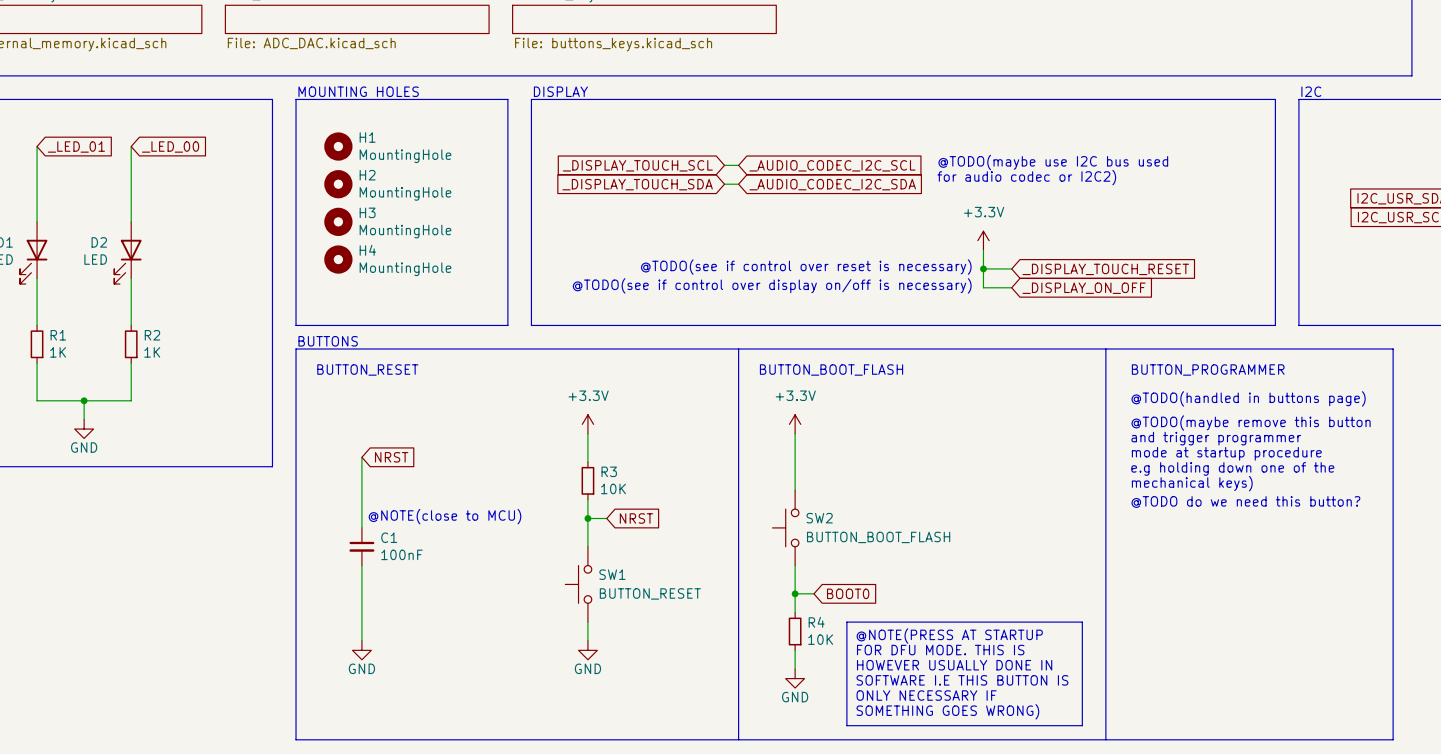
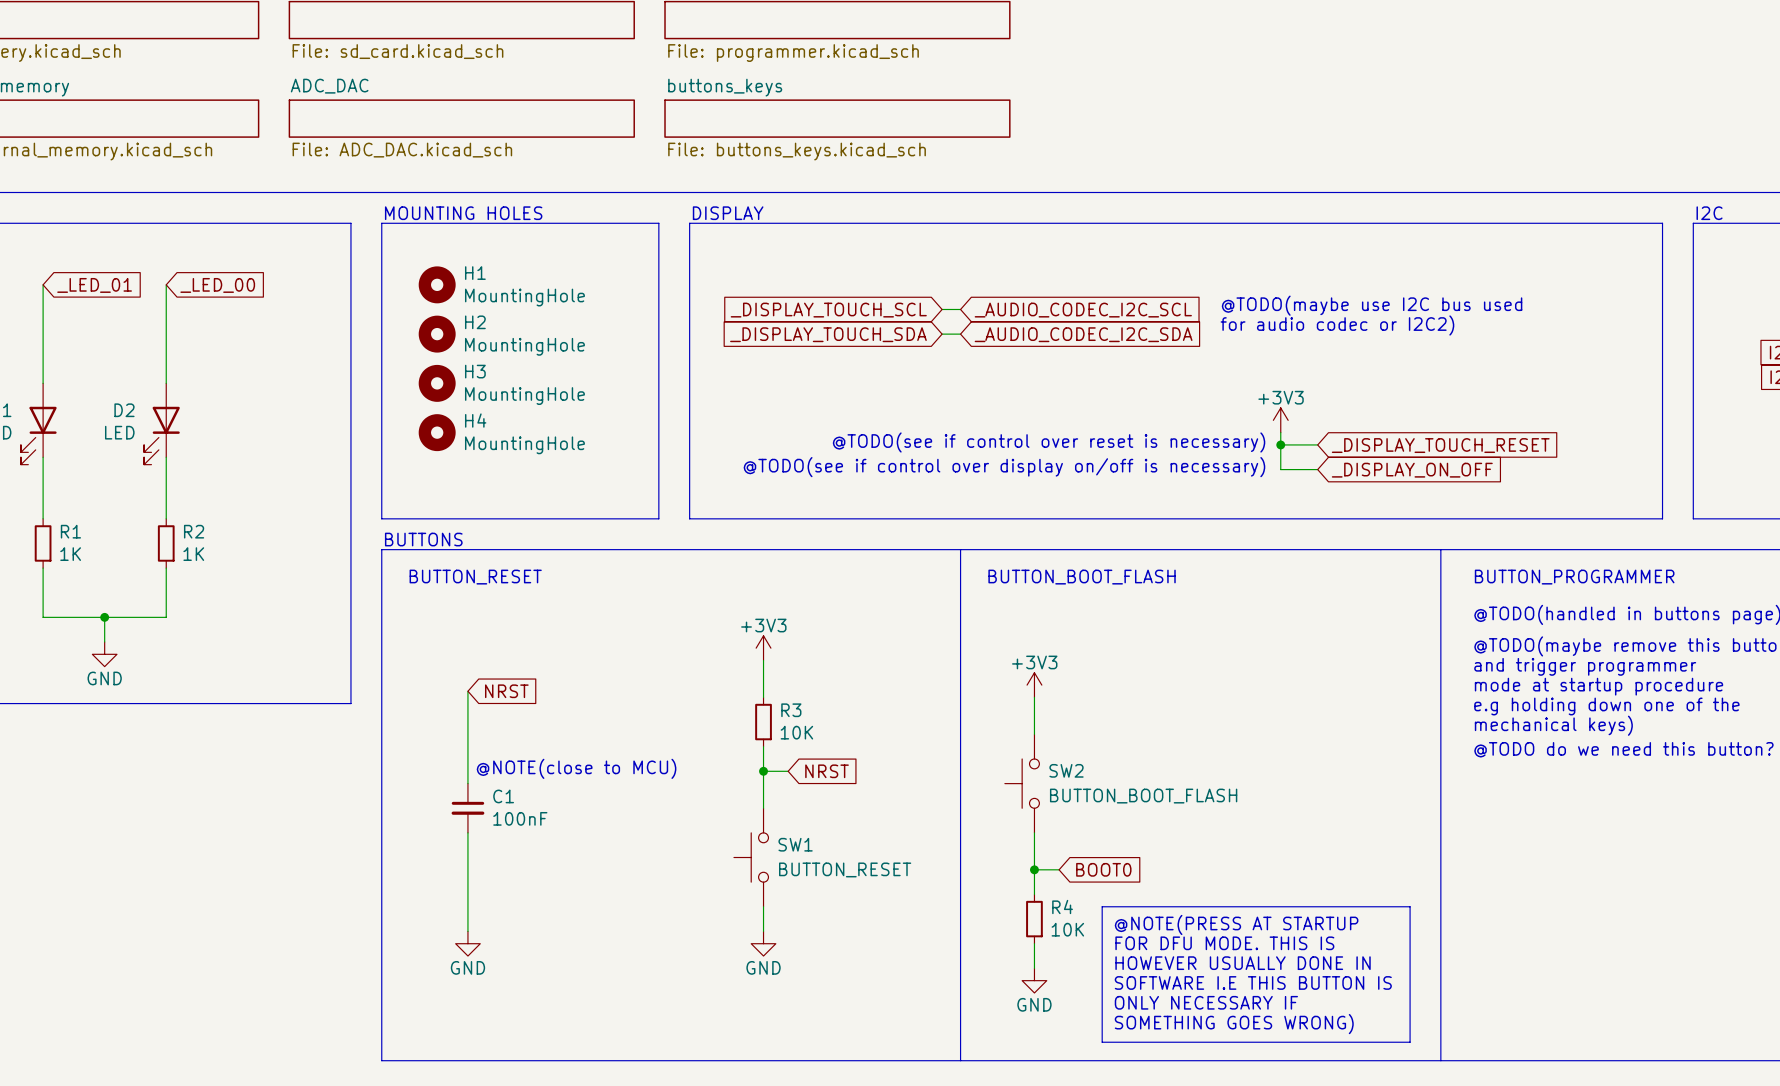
power symbol: +3.3V (983, 240) -> none
power symbol: none -> +3V3 (1280, 420)
power symbol: +3.3V (587, 424) -> +3V3 (763, 648)
power symbol: +3.3V (795, 424) -> none
power symbol: none -> +3V3 (1034, 685)

